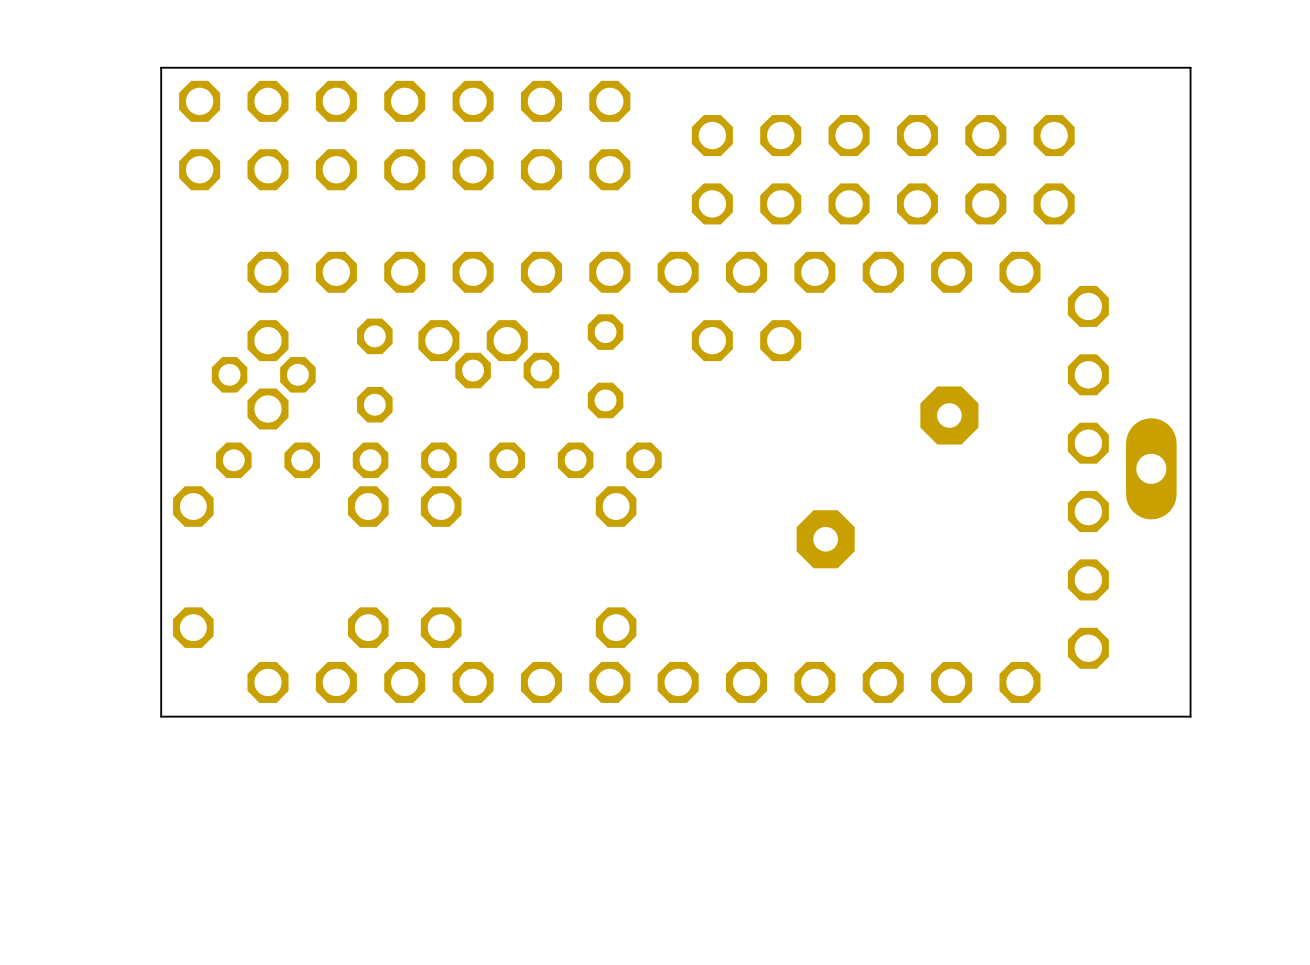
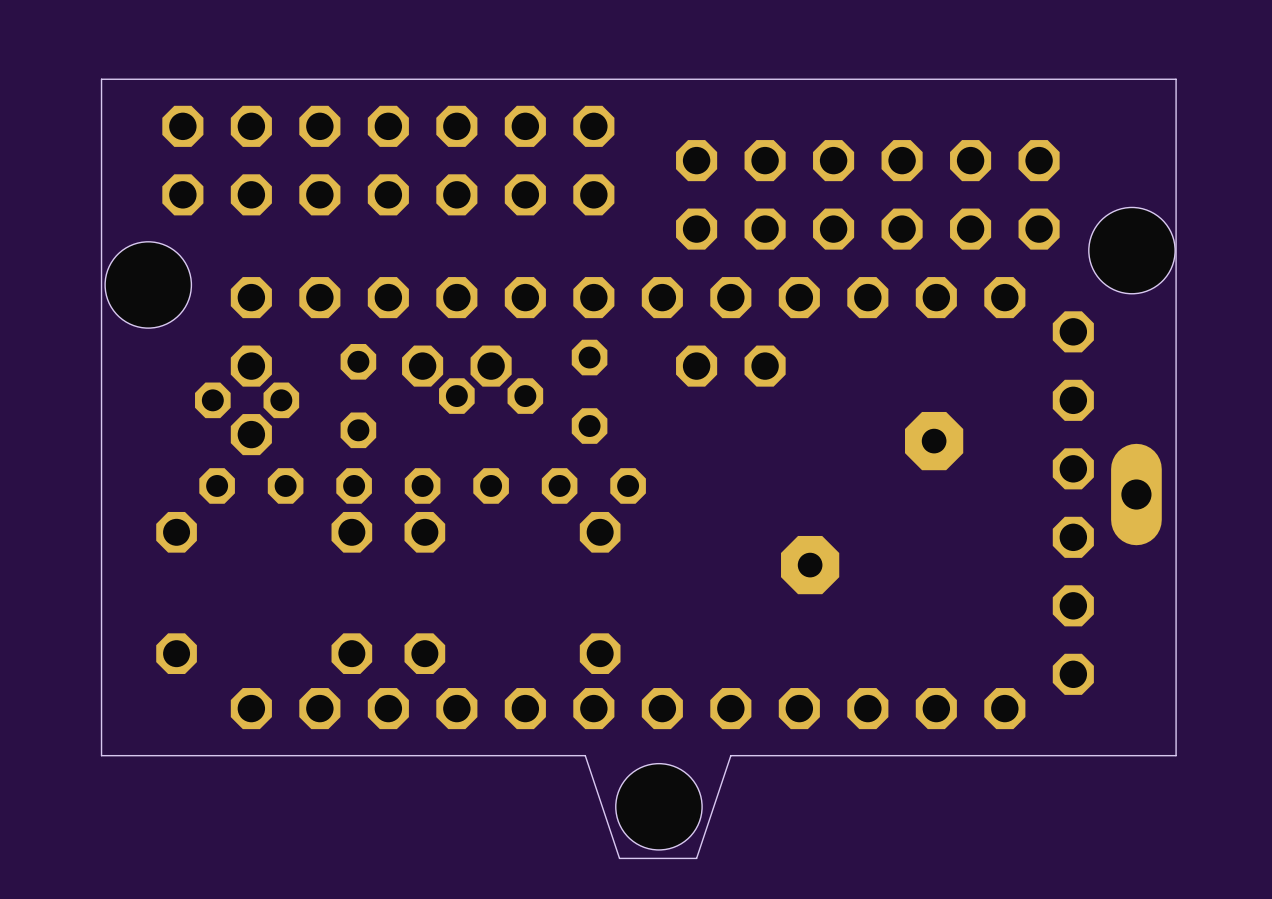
board edge: (1190, 67) (161, 67) (161, 716) (1190, 716) (1190, 67) -> (1176, 79) (1176, 755) (730, 755) (696, 858) (619, 858) (585, 755) (101, 755) (101, 79) (1176, 79)
hole: none -> (1131, 250)
hole: none -> (148, 284)
hole: none -> (658, 806)

